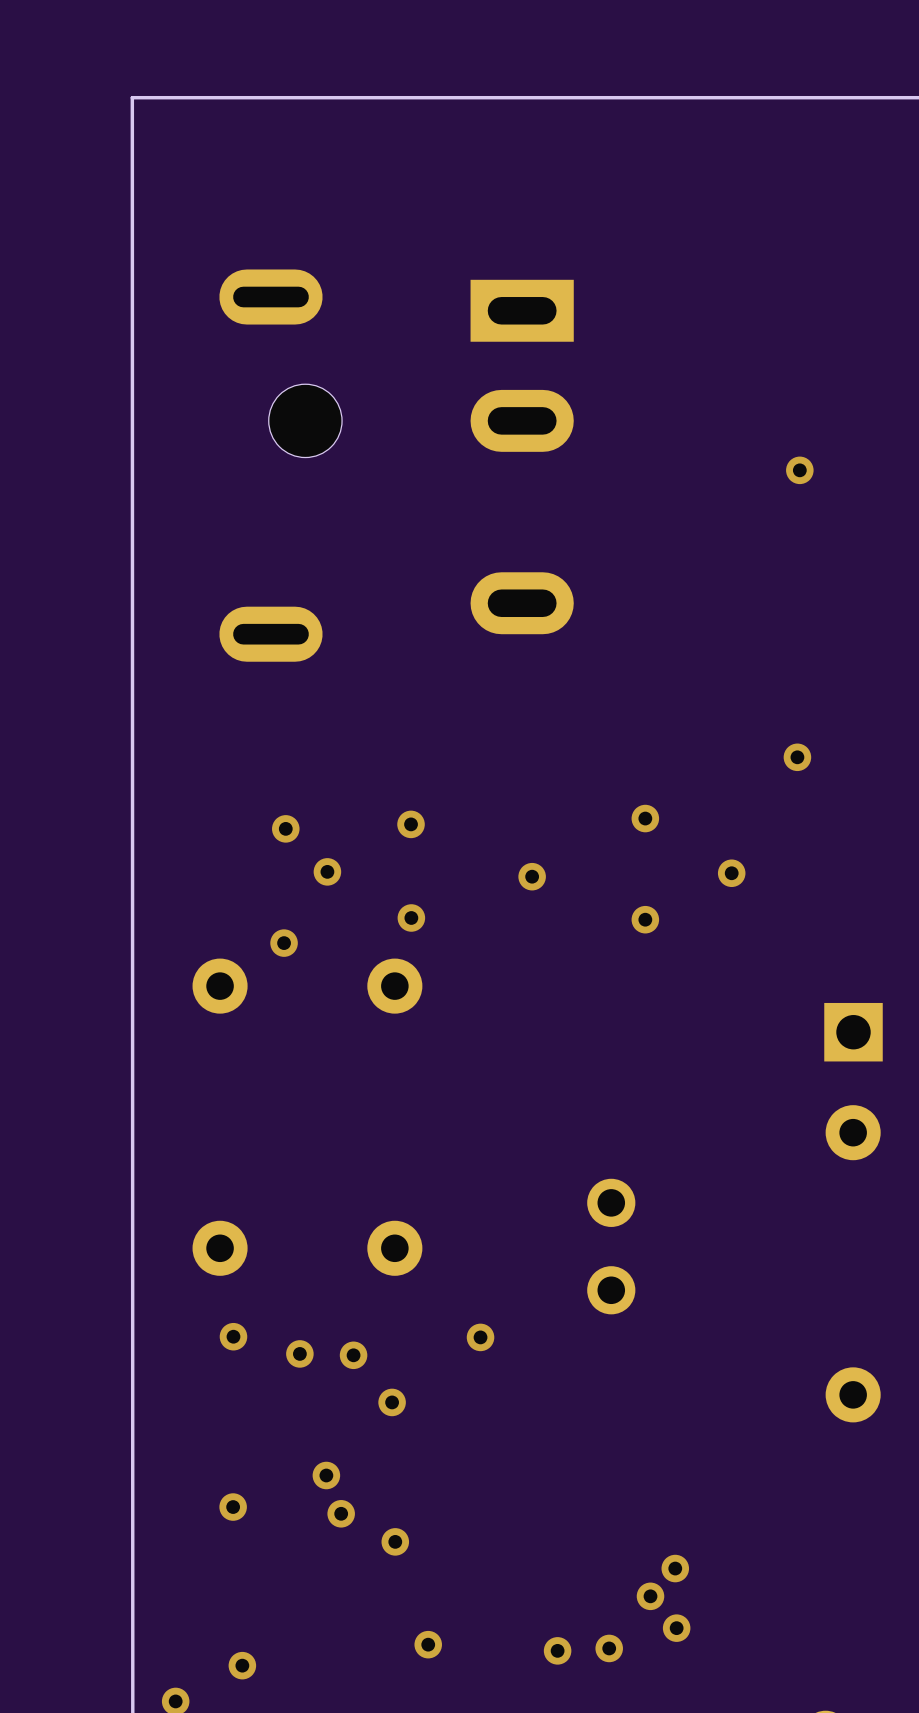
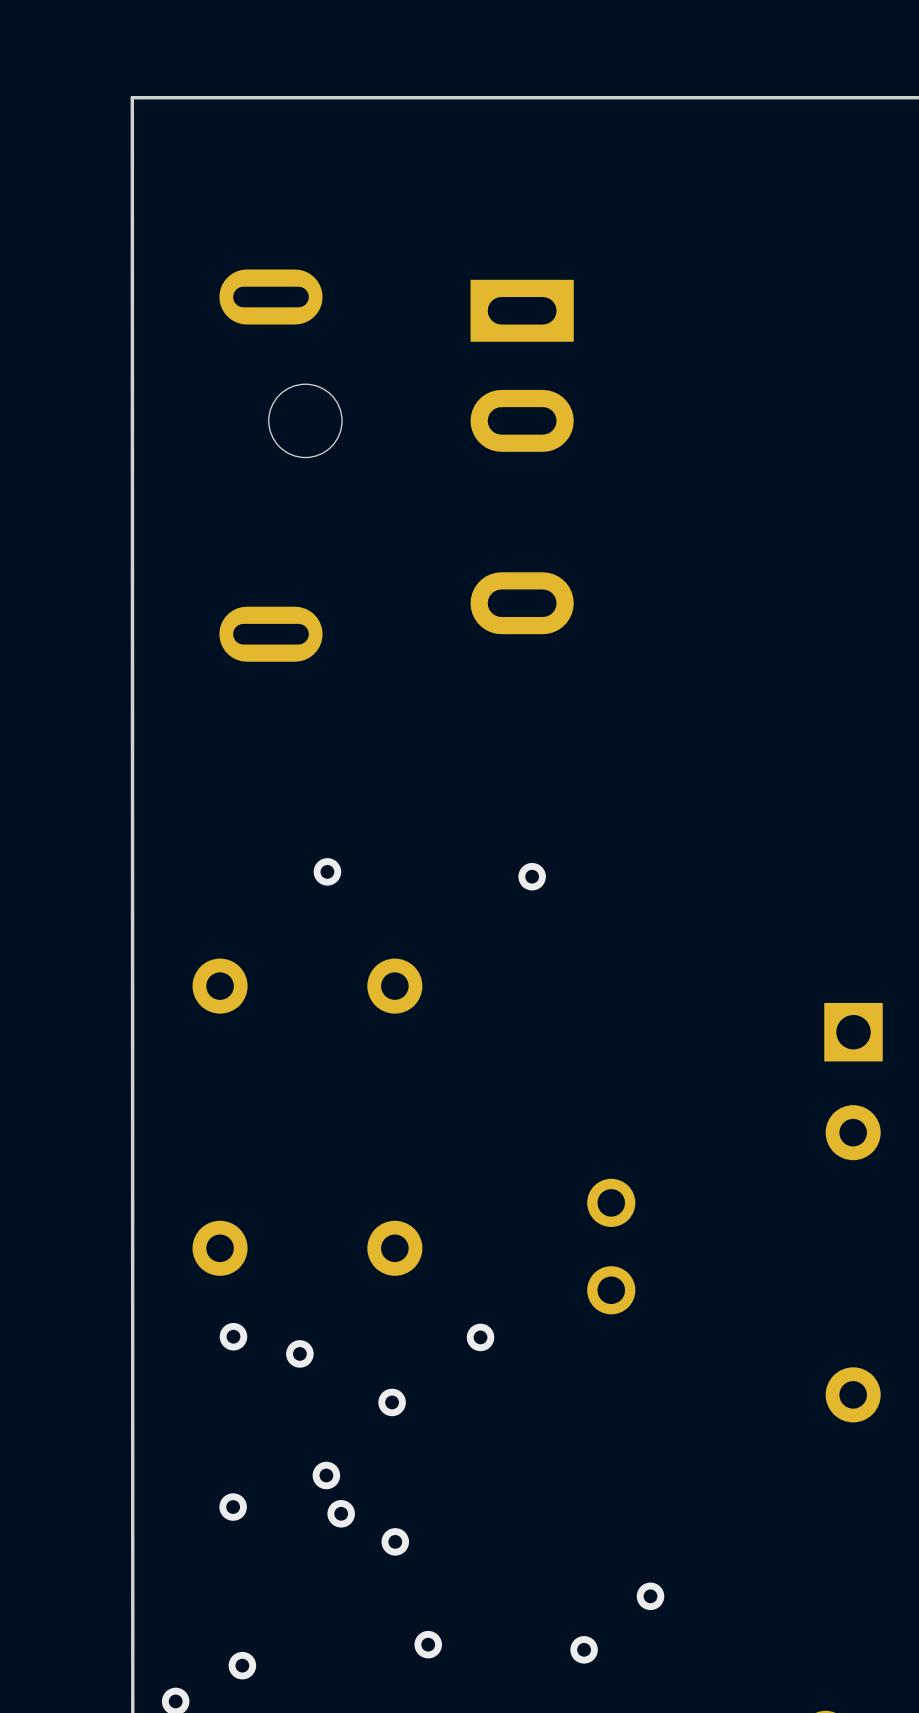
via: (799, 470) -> none
via: (797, 757) -> none
via: (645, 818) -> none
via: (411, 824) -> none
via: (285, 828) -> none
via: (731, 873) -> none
via: (411, 917) -> none
via: (645, 919) -> none
via: (284, 943) -> none
via: (353, 1355) -> none
via: (675, 1568) -> none
via: (676, 1628) -> none
via: (609, 1648) -> none
via: none -> (584, 1649)
via: (557, 1650) -> none

